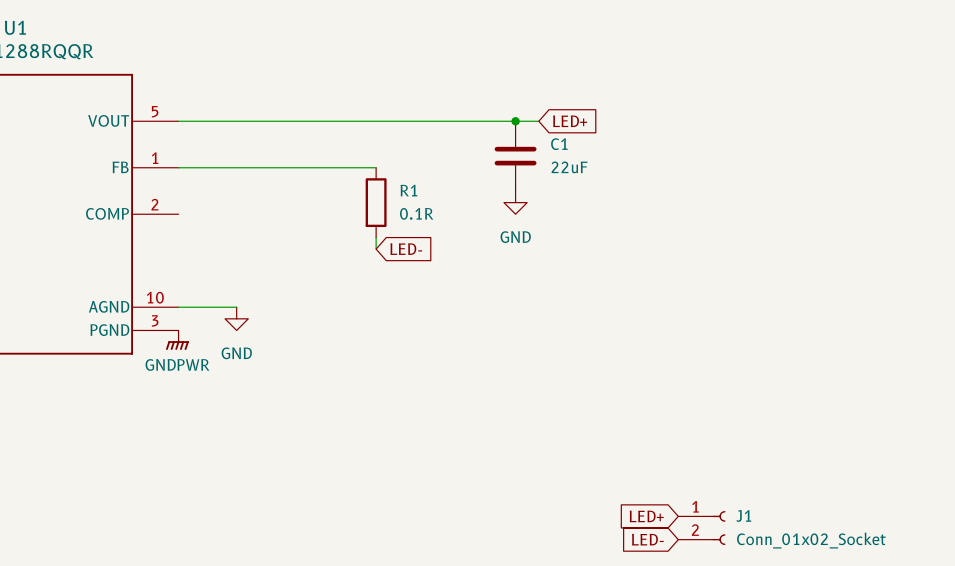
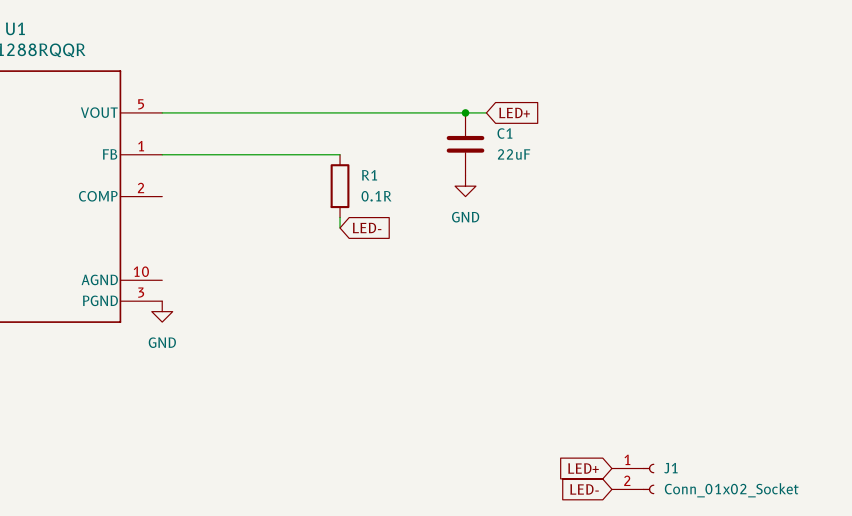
wire: (178, 307) (236, 307) -> none
power symbol: GND (236, 318) -> none
power symbol: GNDPWR (177, 340) -> GND (162, 311)

